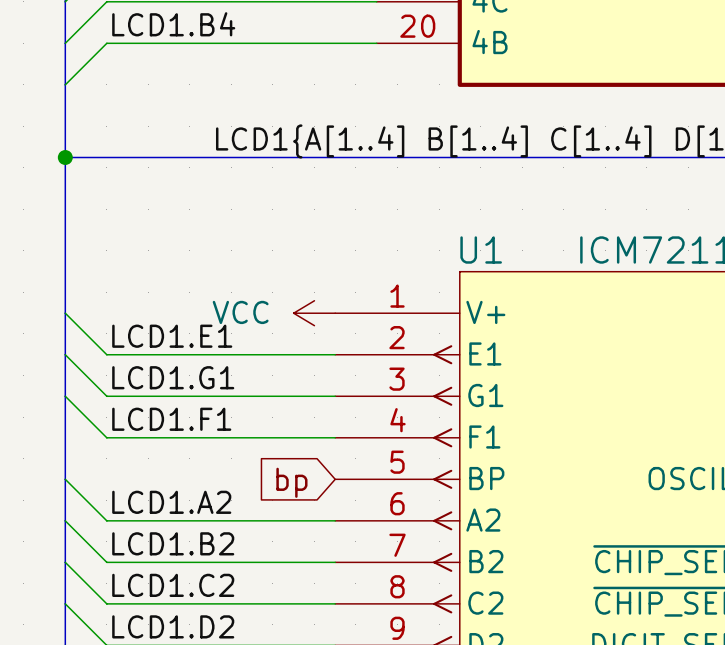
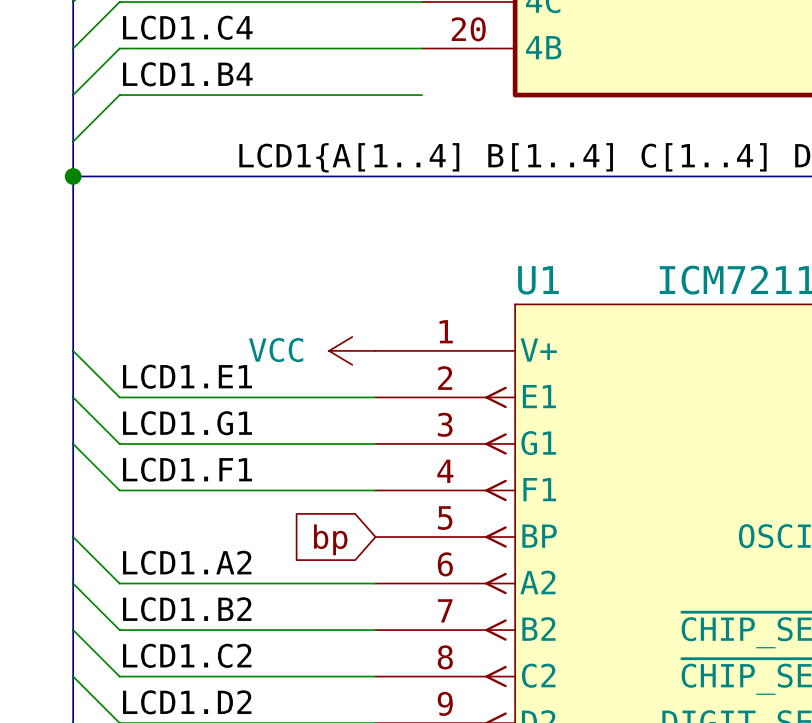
label: LCD1.B4 (173, 24) -> LCD1.C4 (187, 27)
label: none -> LCD1.B4 (187, 74)
wire: none -> (422, 95) (119, 95) (73, 141)

